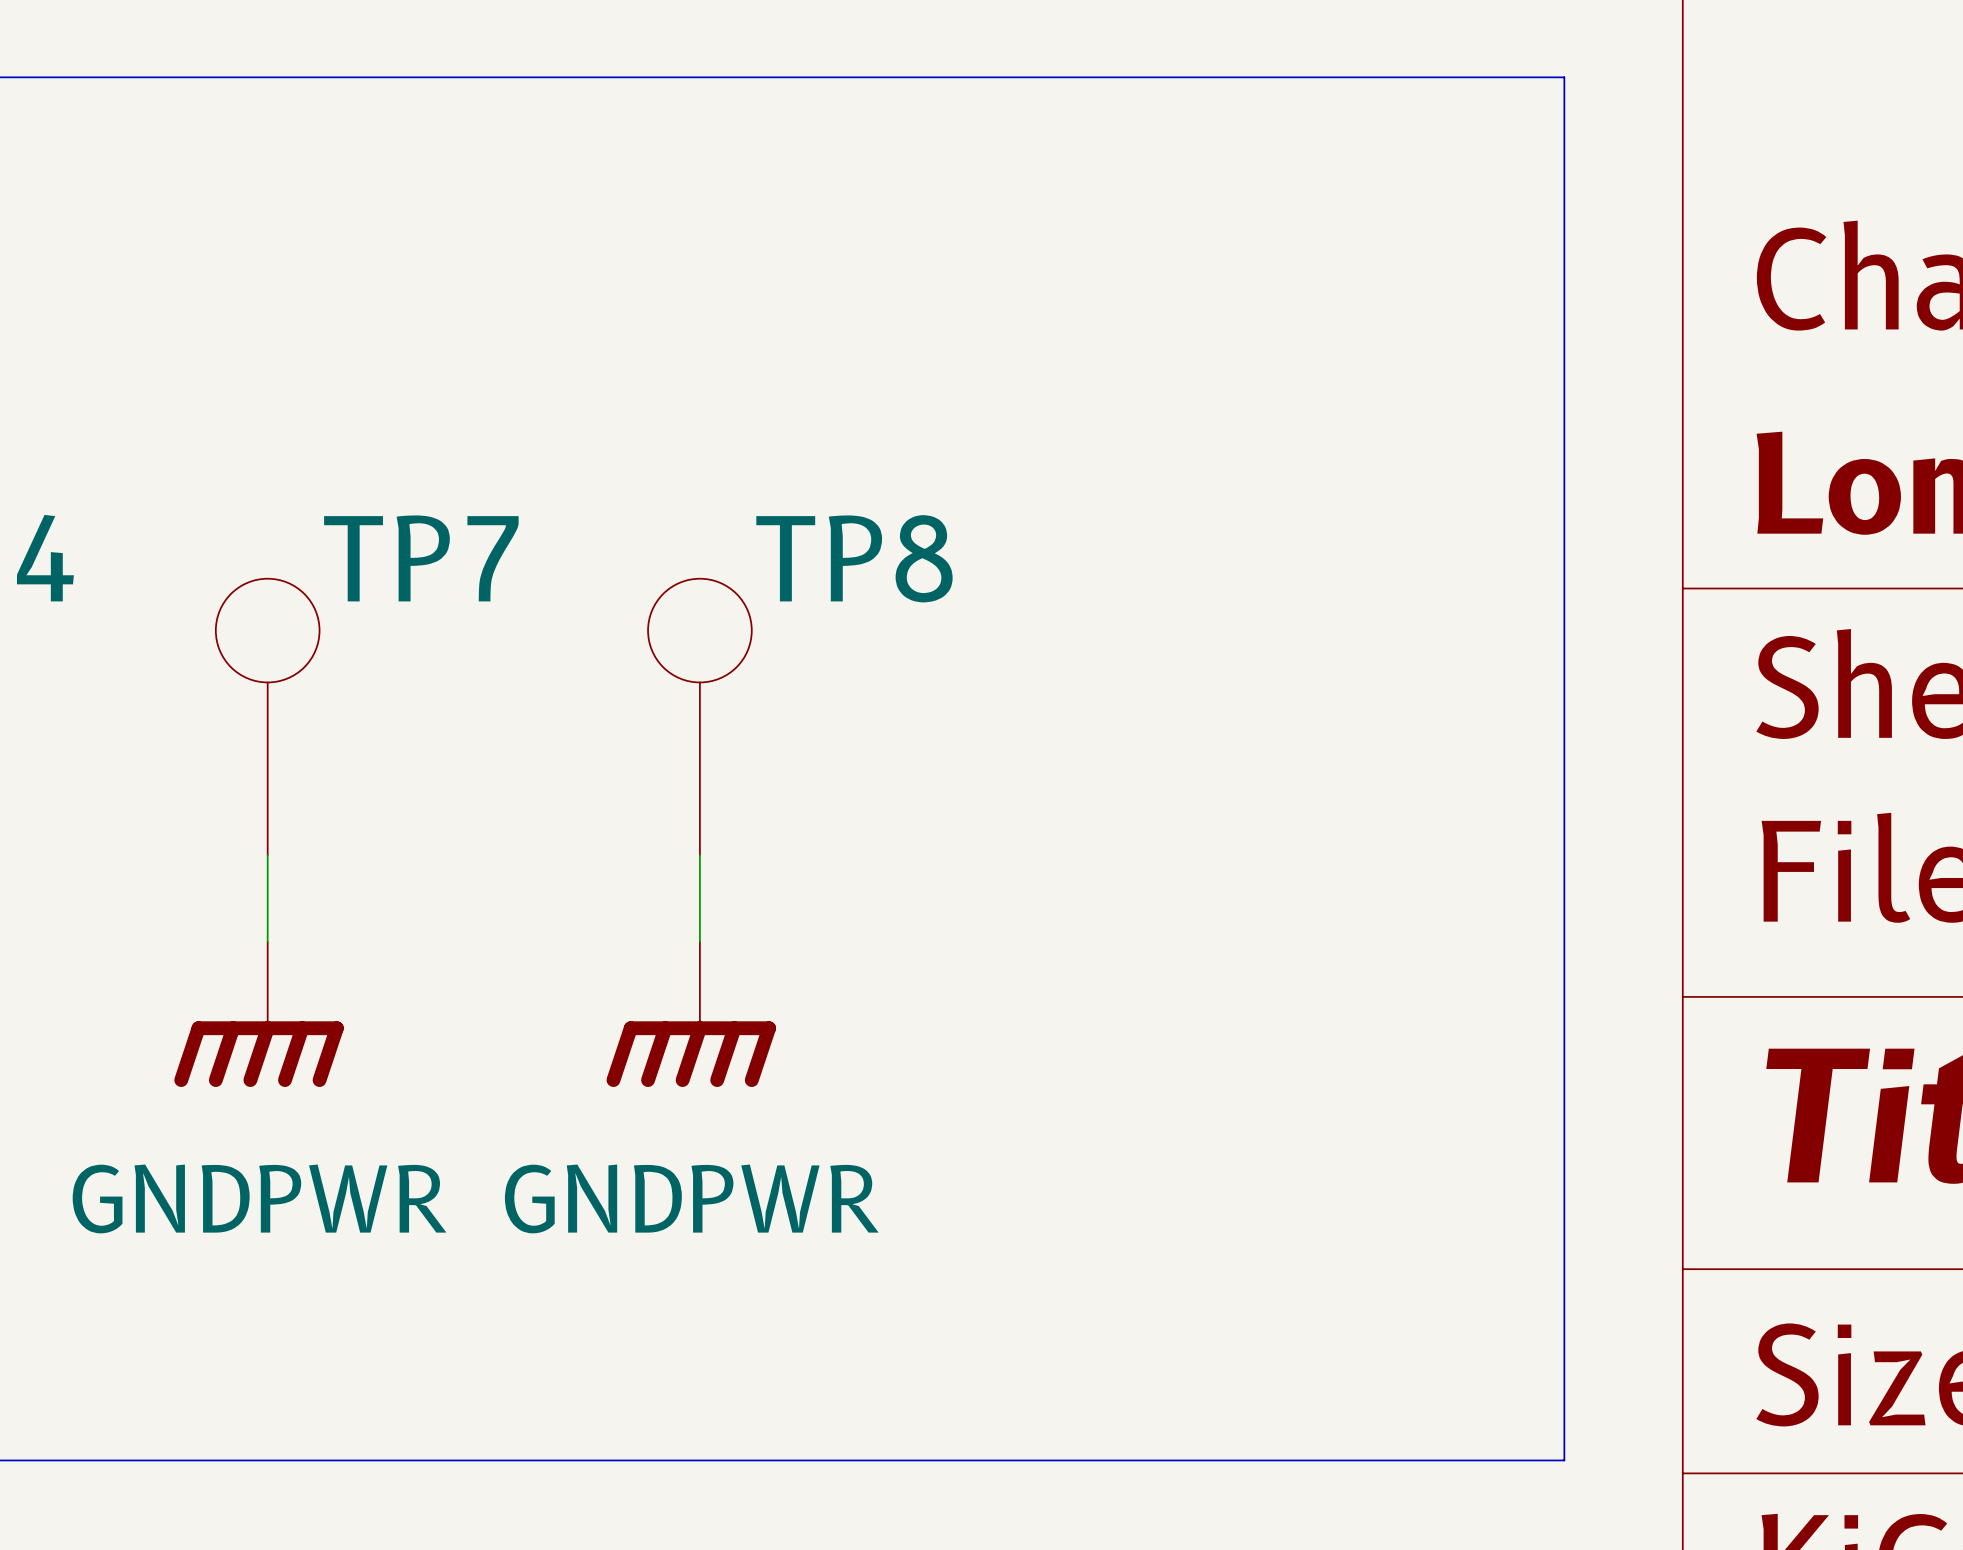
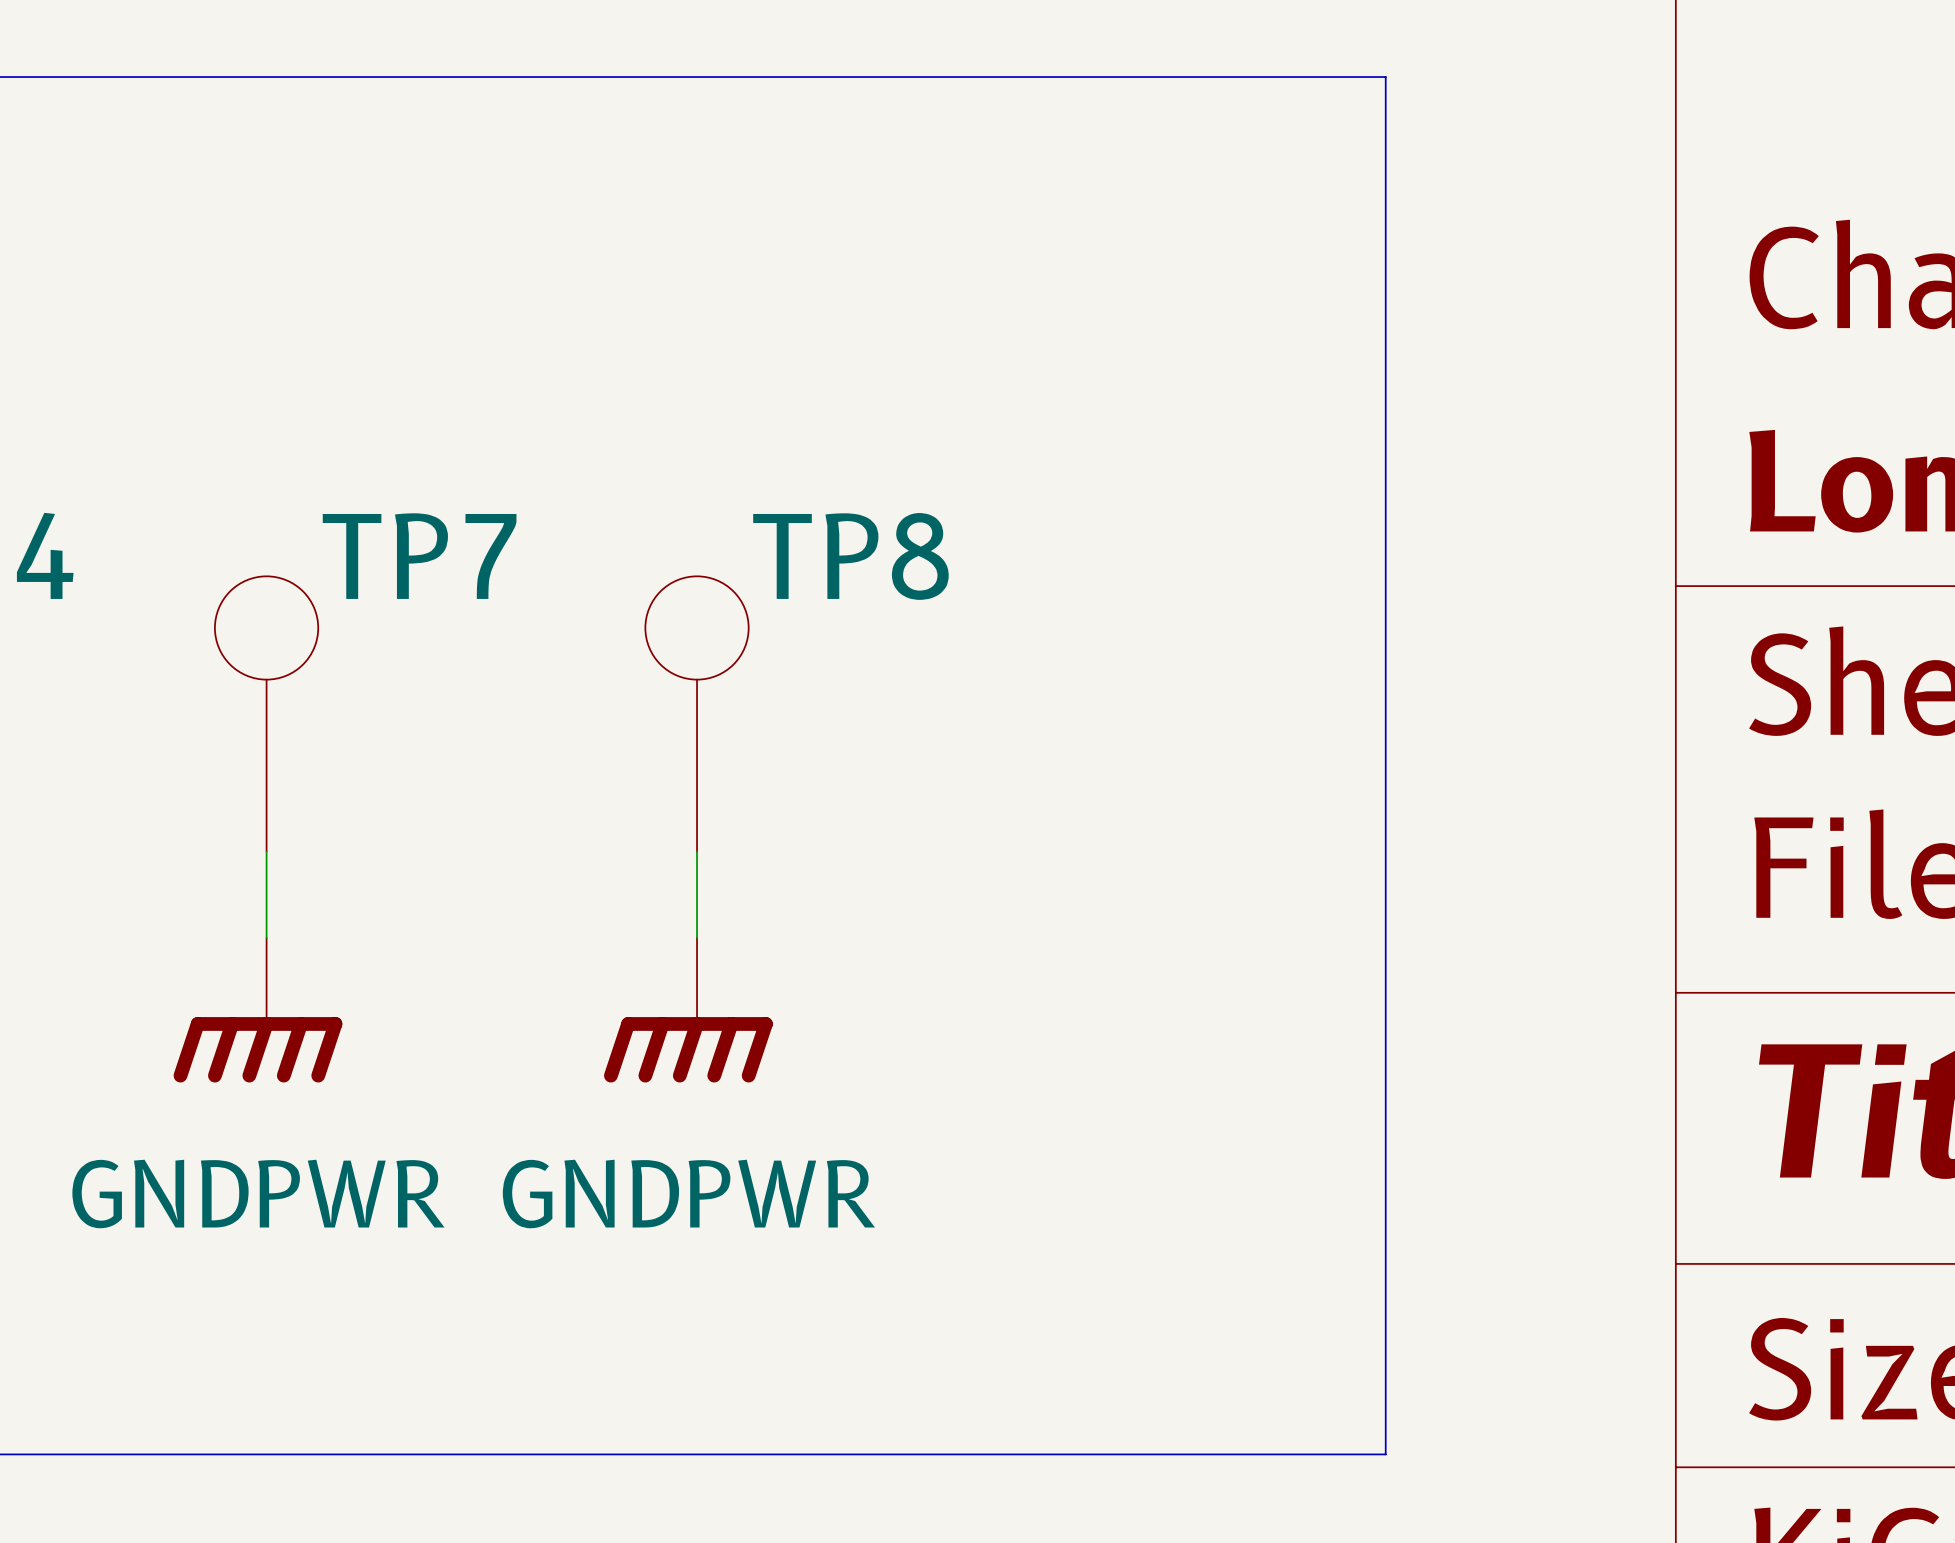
line: (1391, 77) (1564, 77) (1564, 1460) (1391, 1460) -> (1385, 77) (1385, 1454)

